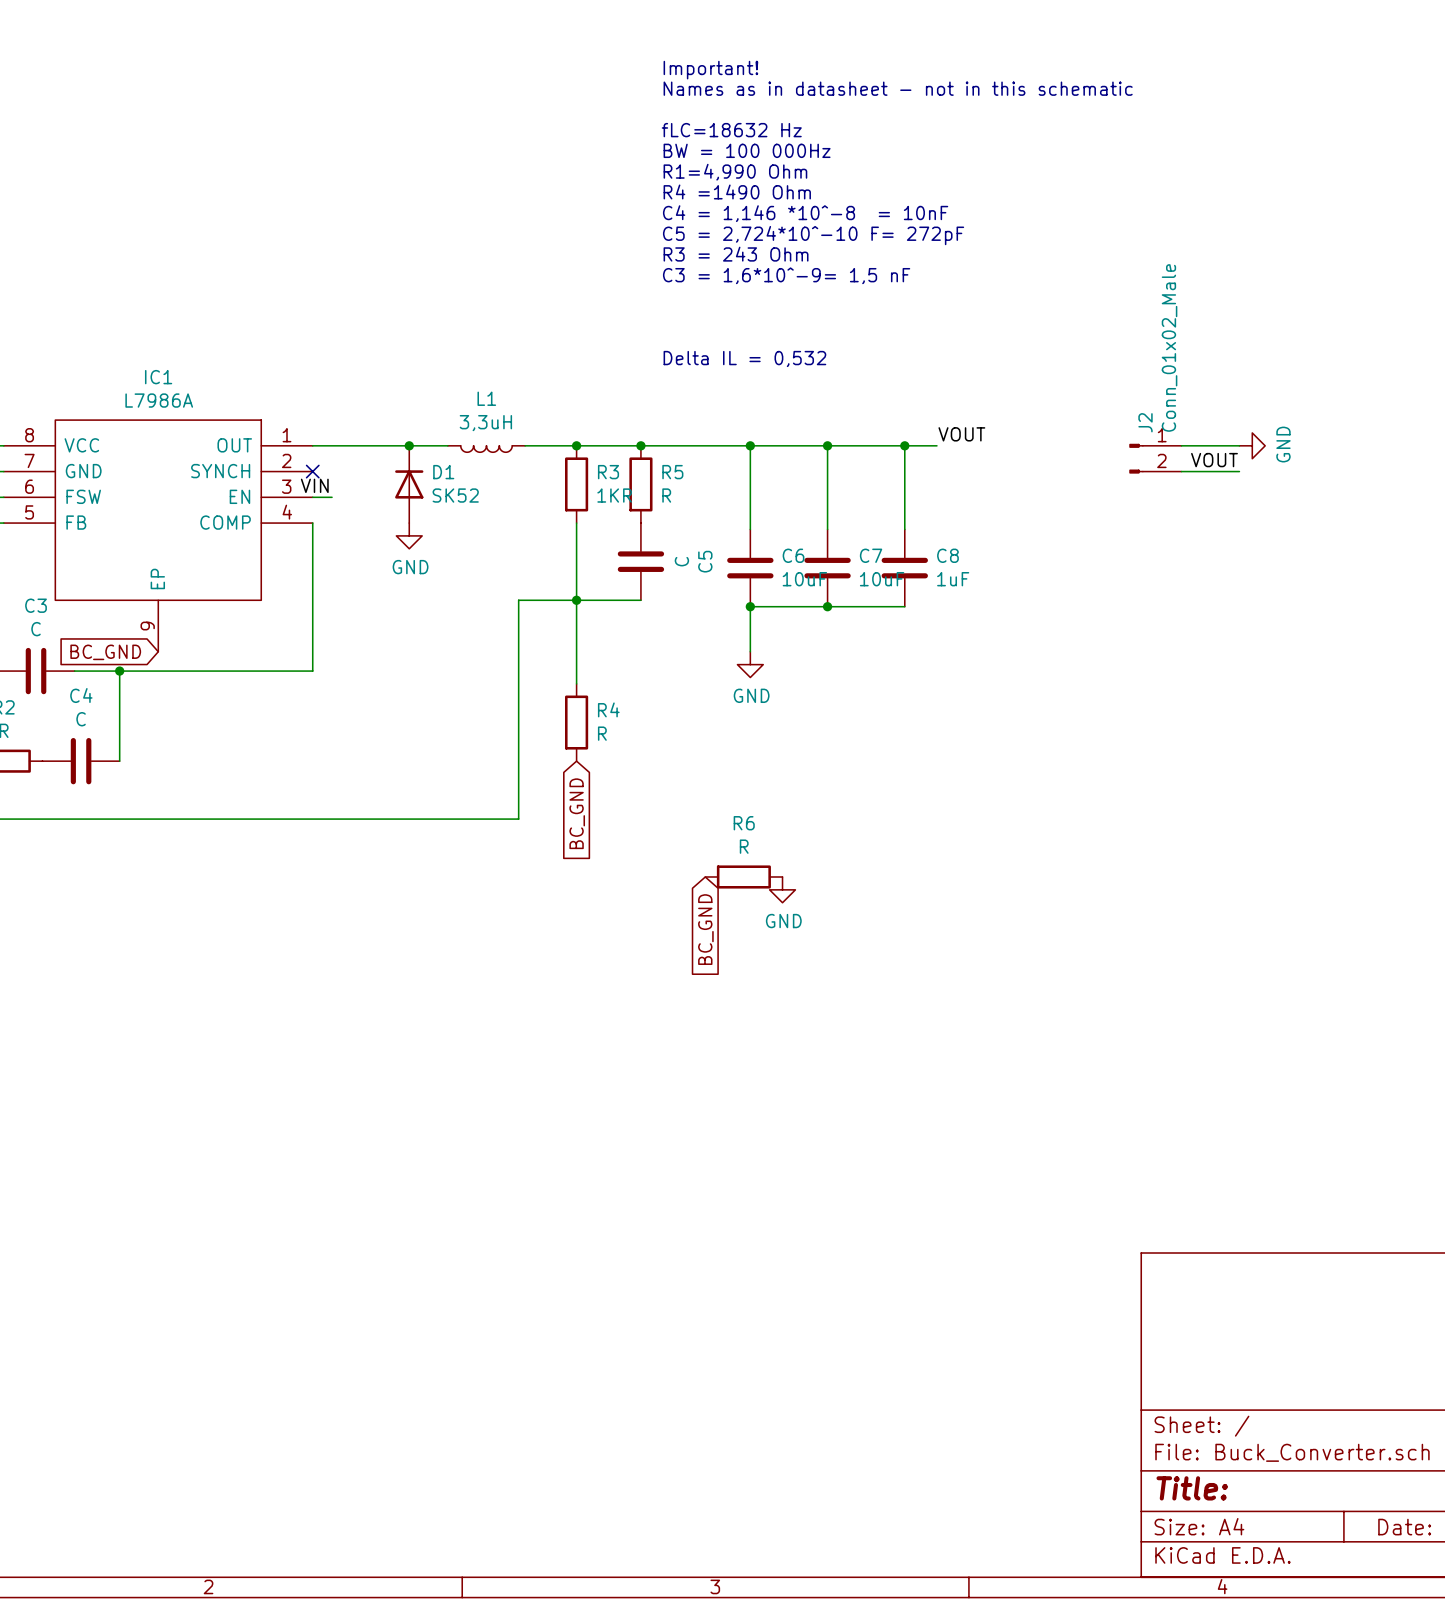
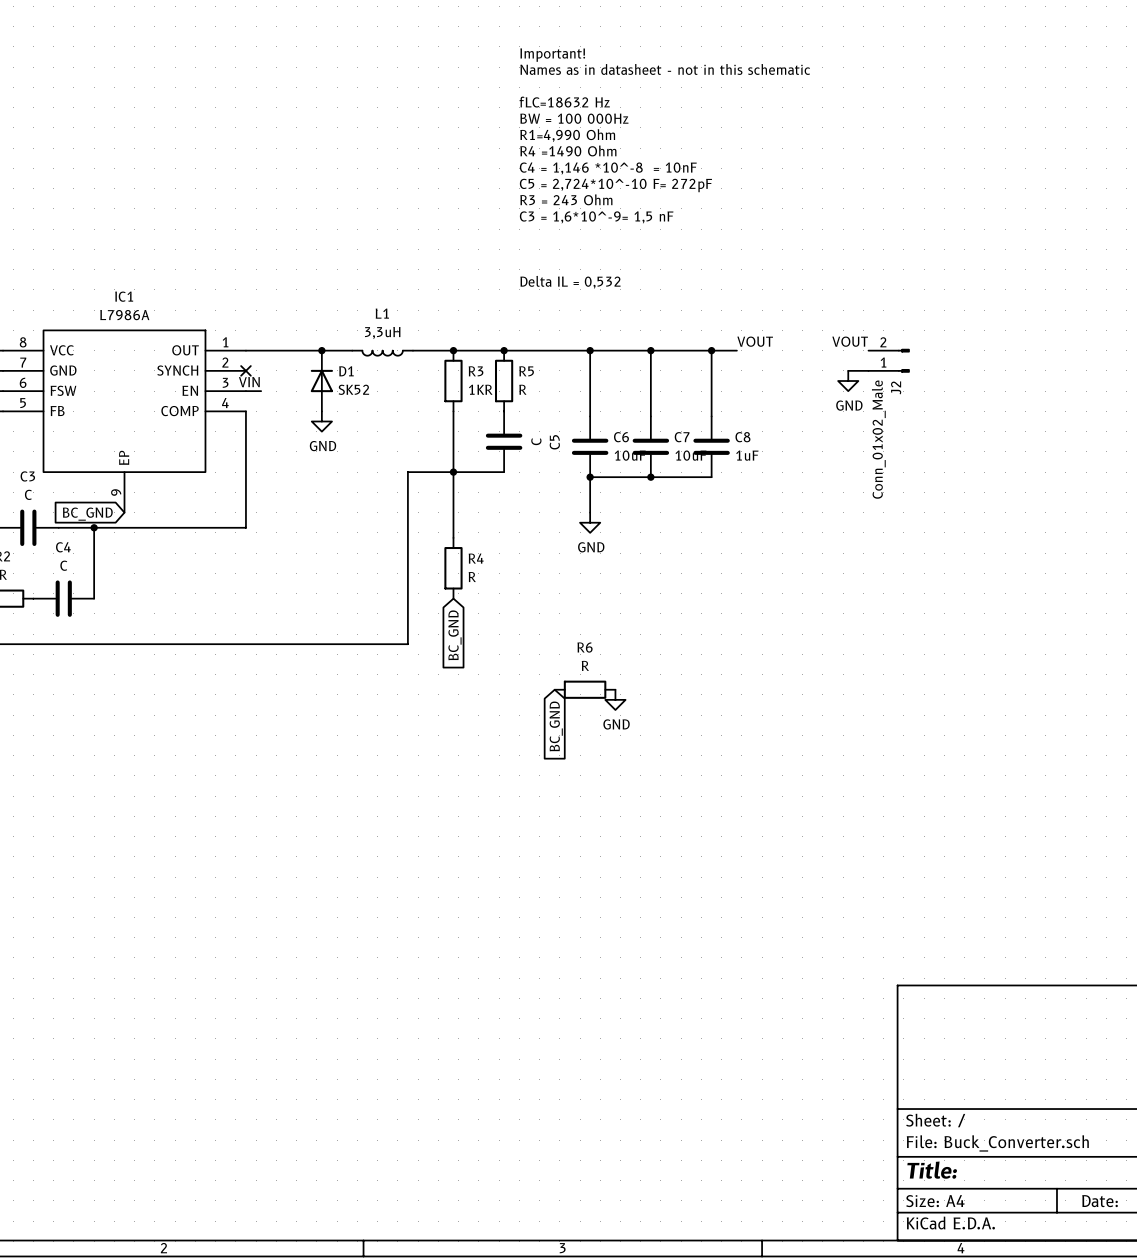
wire: (1181, 445) (1239, 445) -> none
power symbol rotation: 0° (1252, 445) -> 90° clockwise (848, 381)
power symbol position: GND (1252, 445) -> GND (848, 381)
J2 rotation: 0° (1136, 458) -> 180° (903, 360)
label position: VOUT (1214, 460) -> VOUT (850, 341)
wire: none -> (848, 370) (868, 370)
wire: (1181, 471) (1239, 471) -> none

